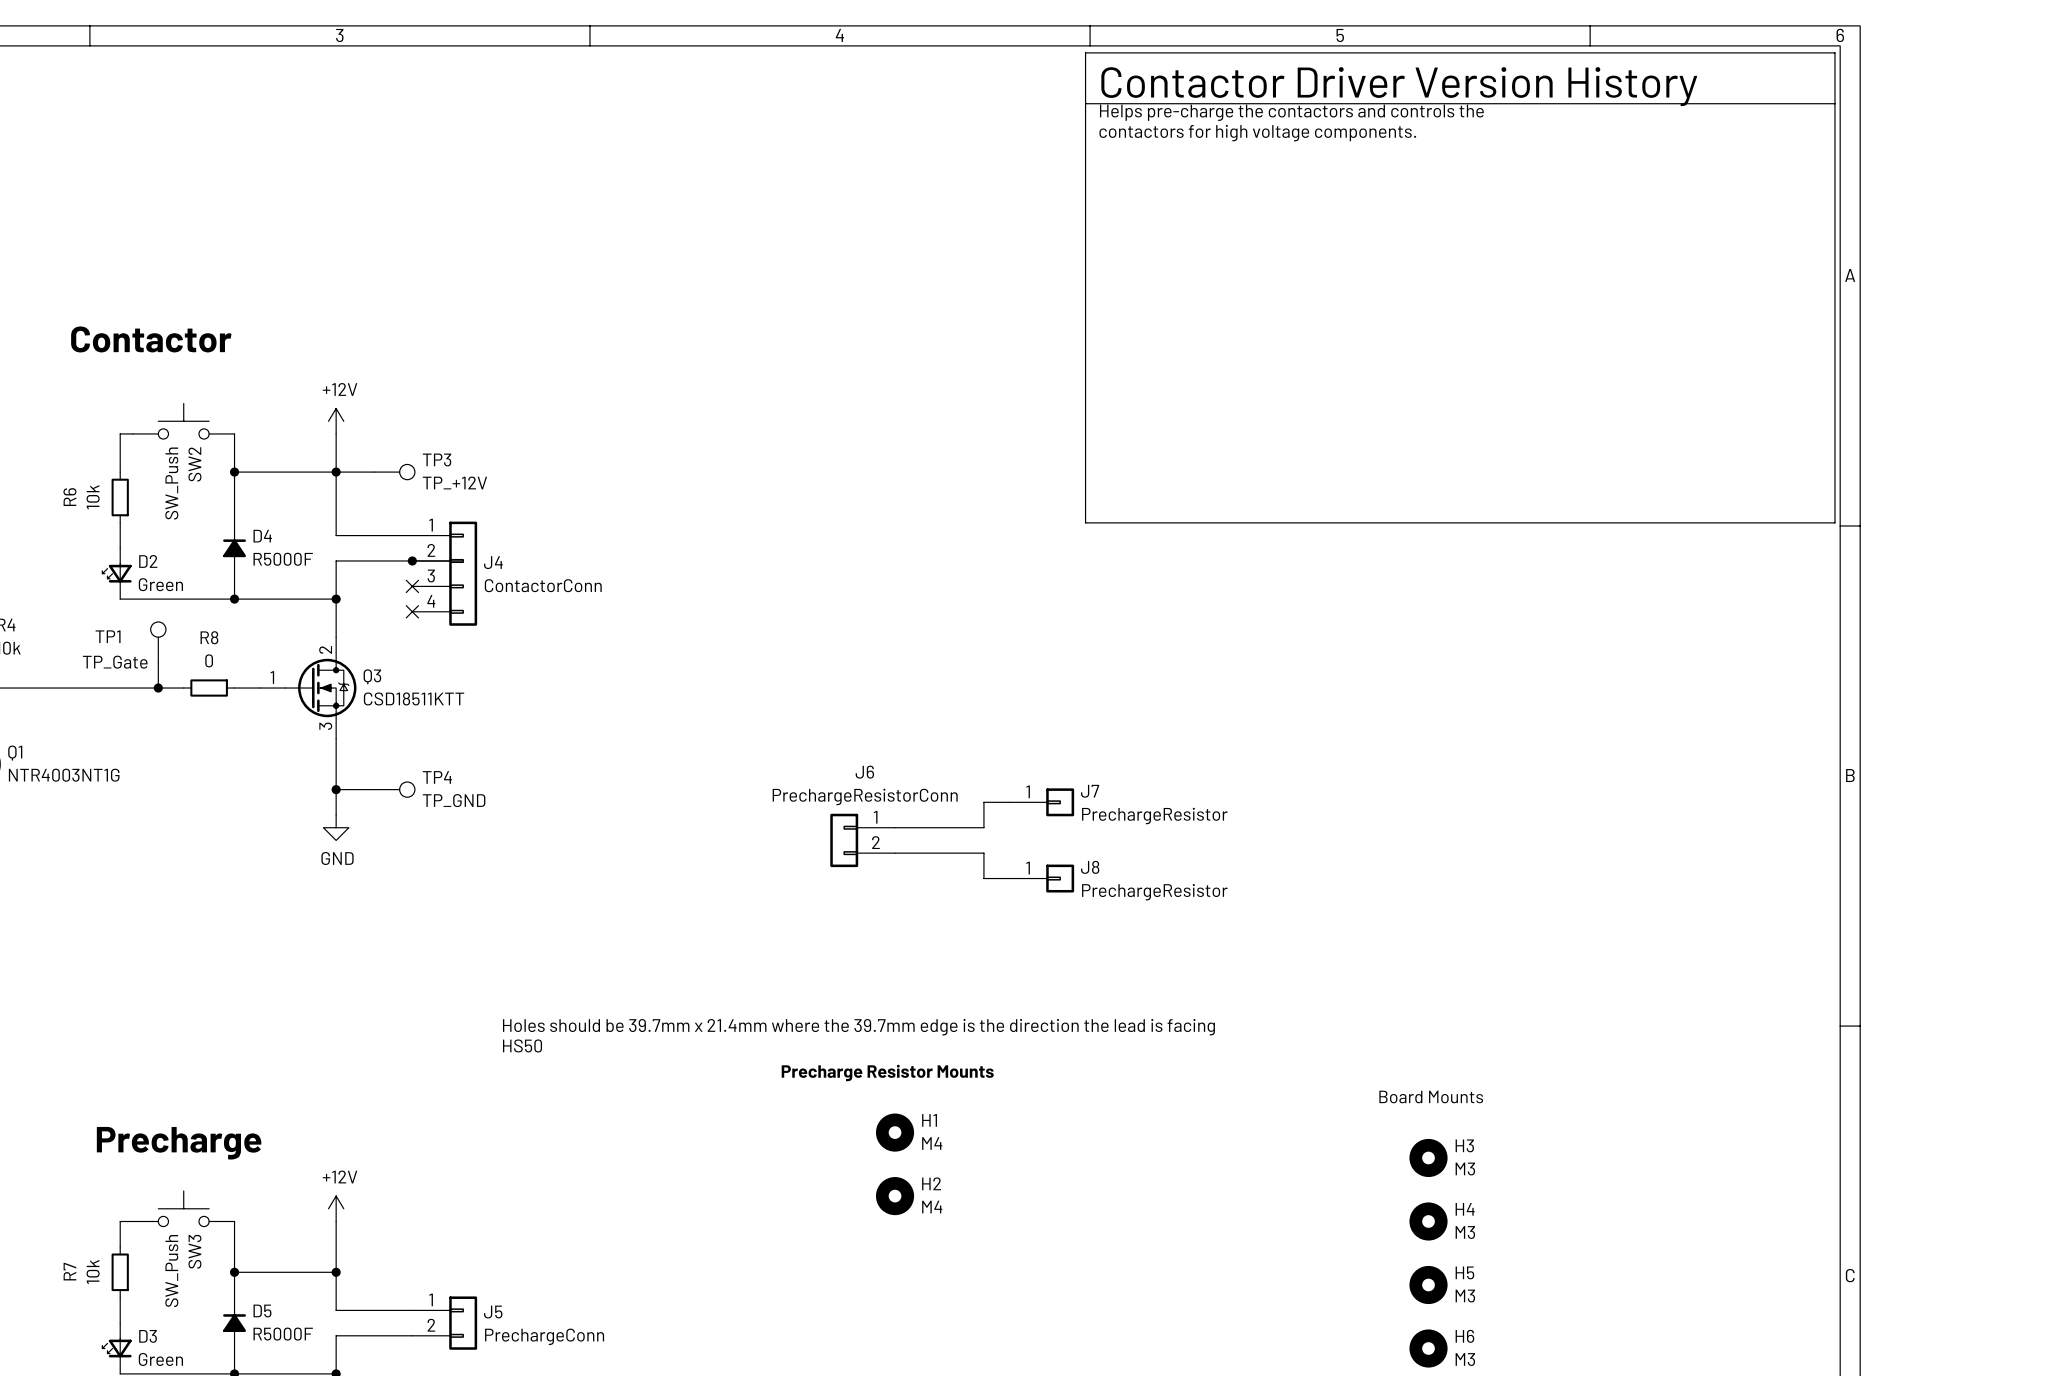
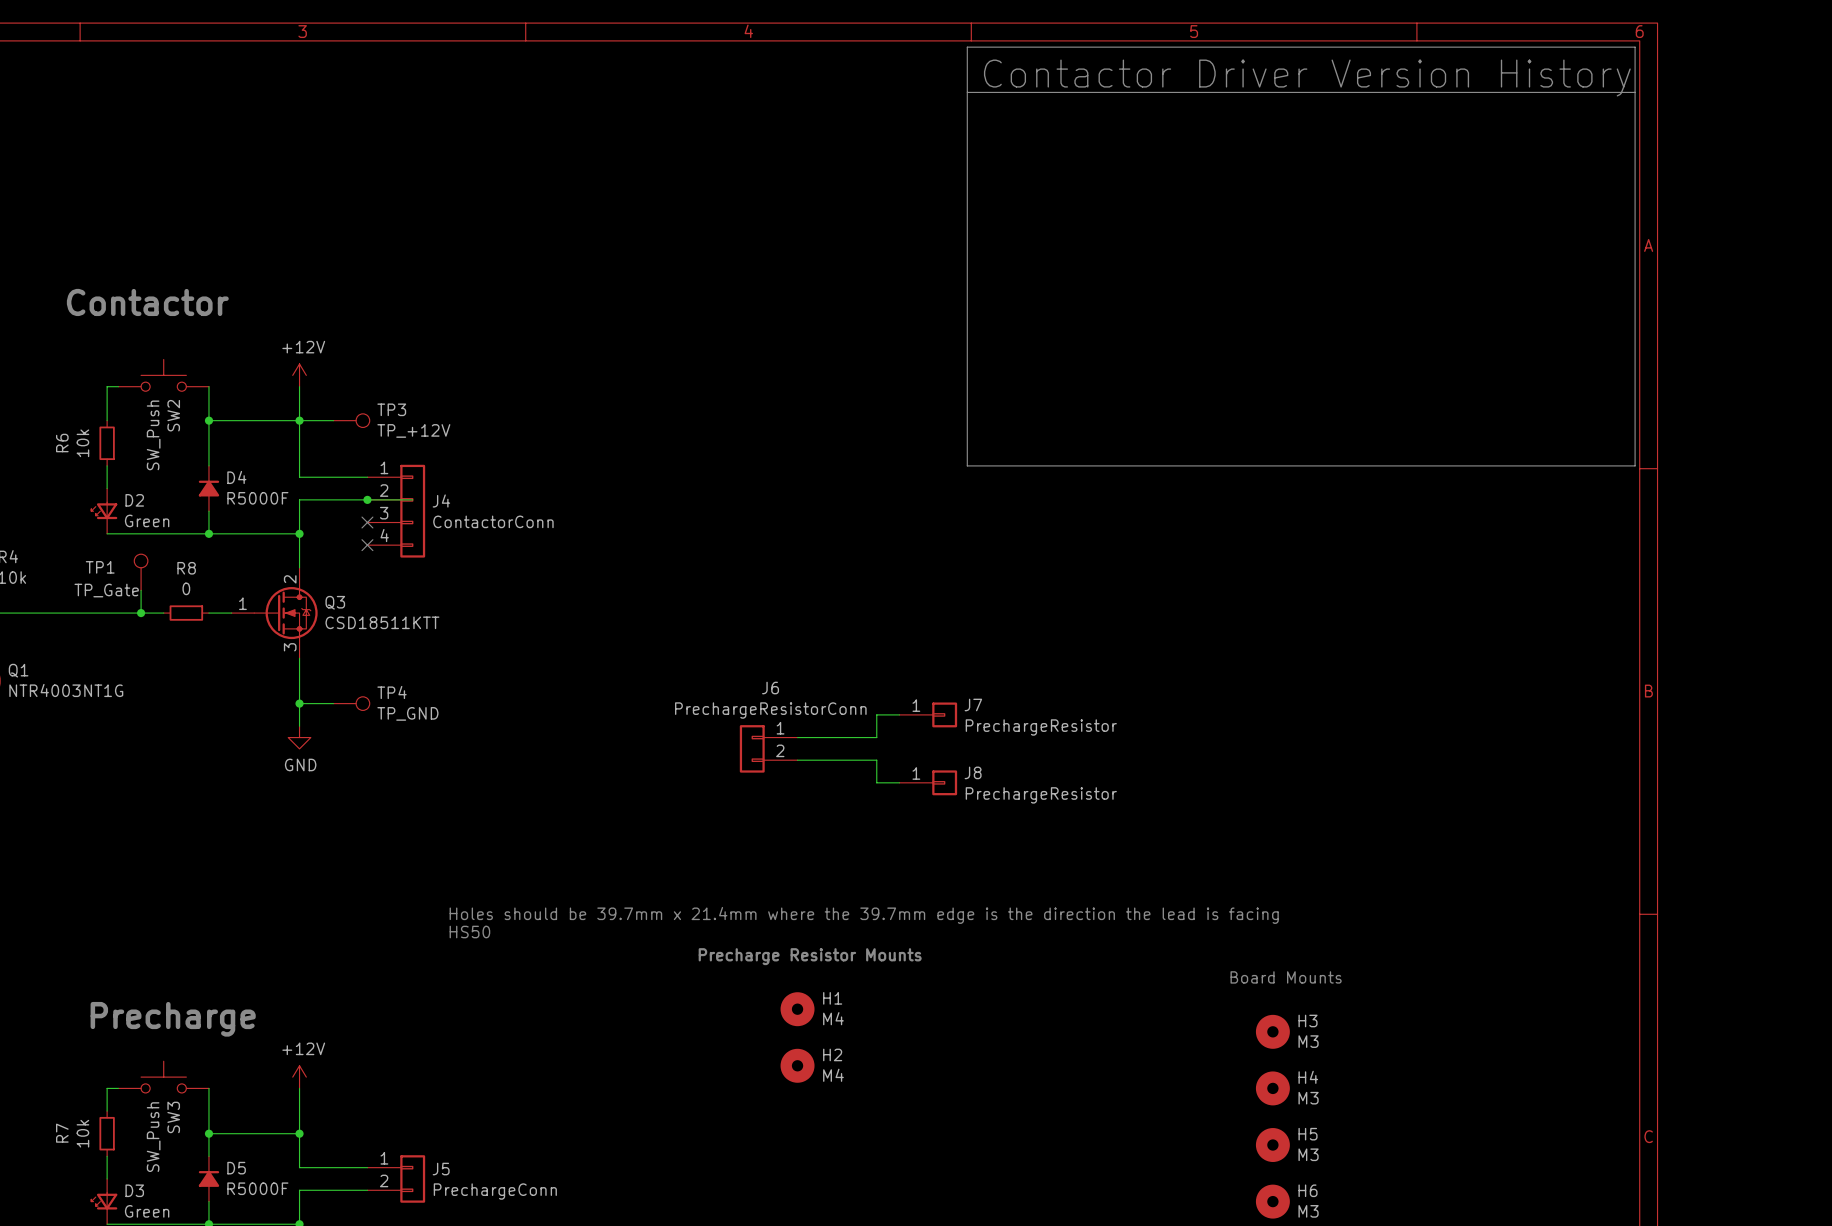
text: Helps pre-charge the contactors and controls the (1291, 112) -> none
text: contactors for high voltage components. (1257, 133) -> none

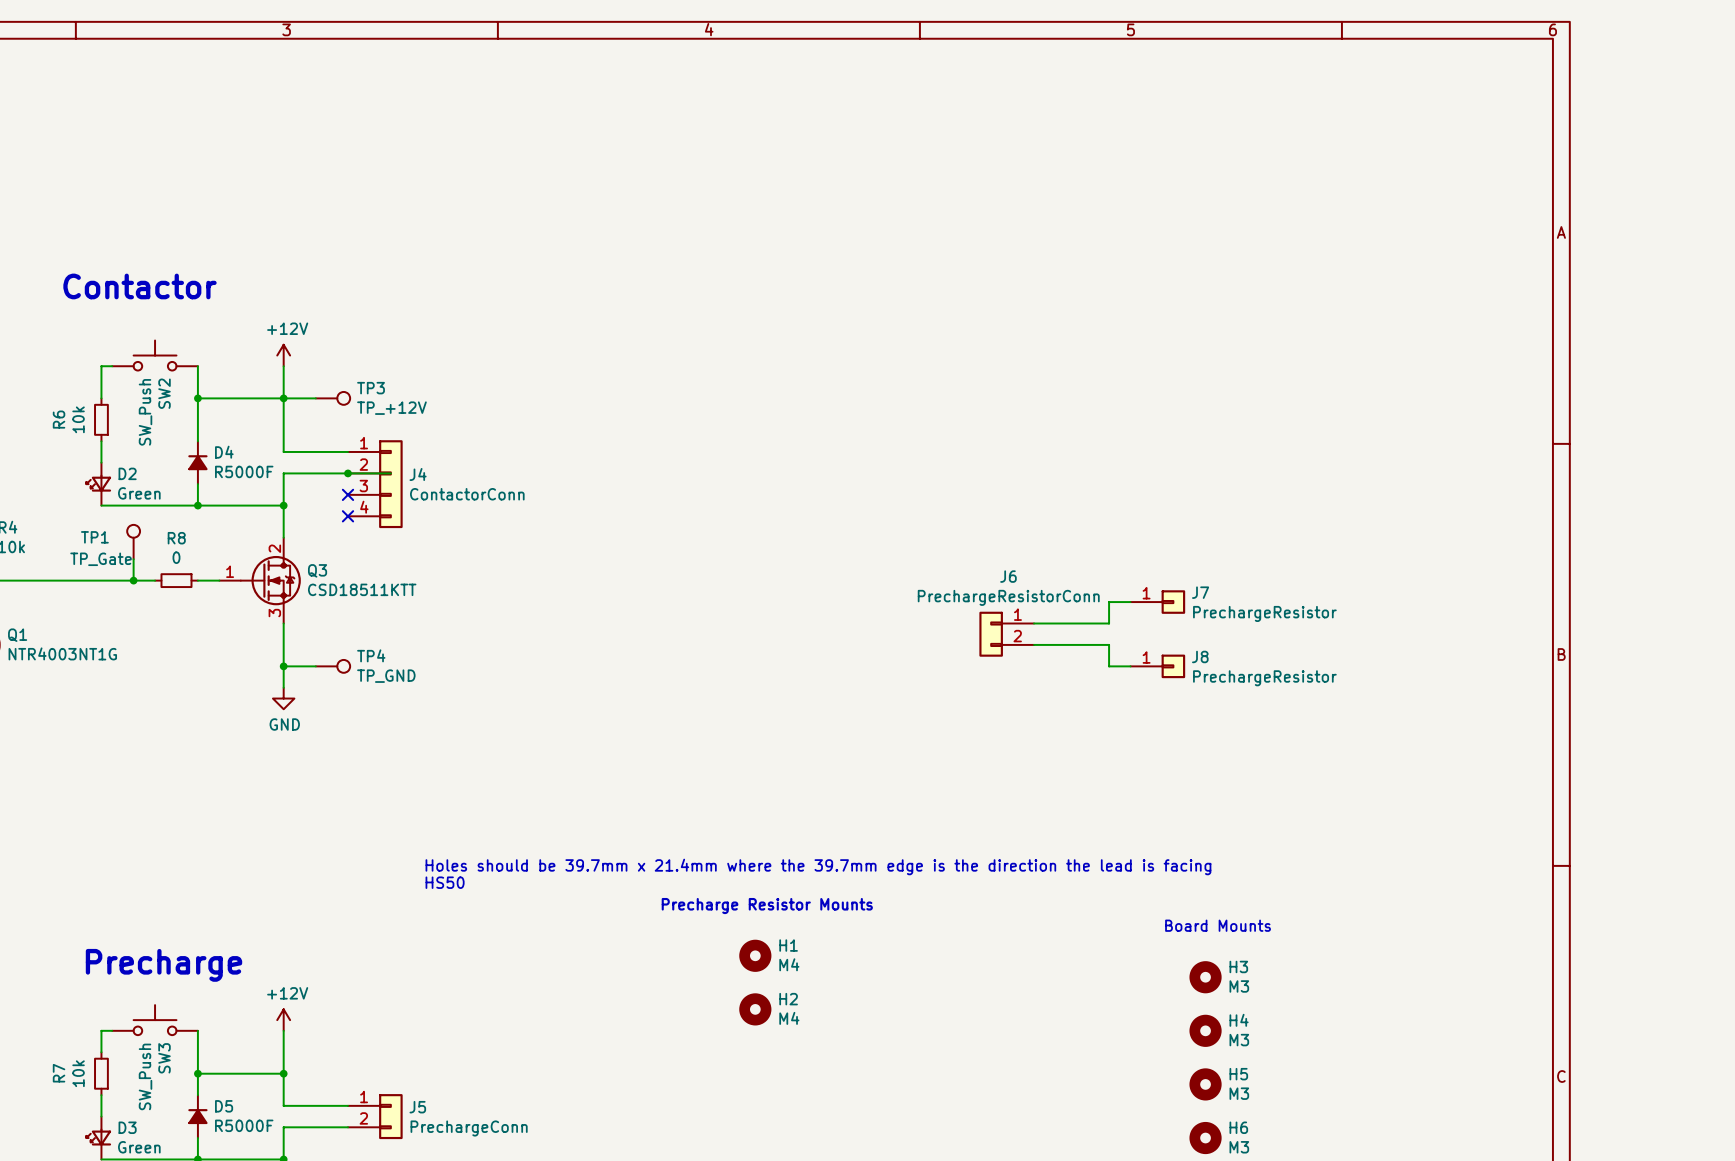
line: (967, 47) (1635, 47) (1635, 465) (967, 465) (967, 47) -> none
text: Contactor Driver Version History (1307, 78) -> none
line: (967, 92) (1635, 92) -> none
wire: none -> (1130, 602) (1109, 602) (1109, 623) (1034, 623)
wire: none -> (1034, 644) (1109, 644) (1109, 666) (1130, 666)
wire: (899, 714) (876, 714) (876, 737) (797, 737) -> none
J7 position: (928, 714) -> (1157, 602)
J6 position: (768, 748) -> (1006, 634)
wire: (797, 760) (876, 760) (876, 782) (899, 782) -> none
J8 position: (928, 782) -> (1157, 666)

